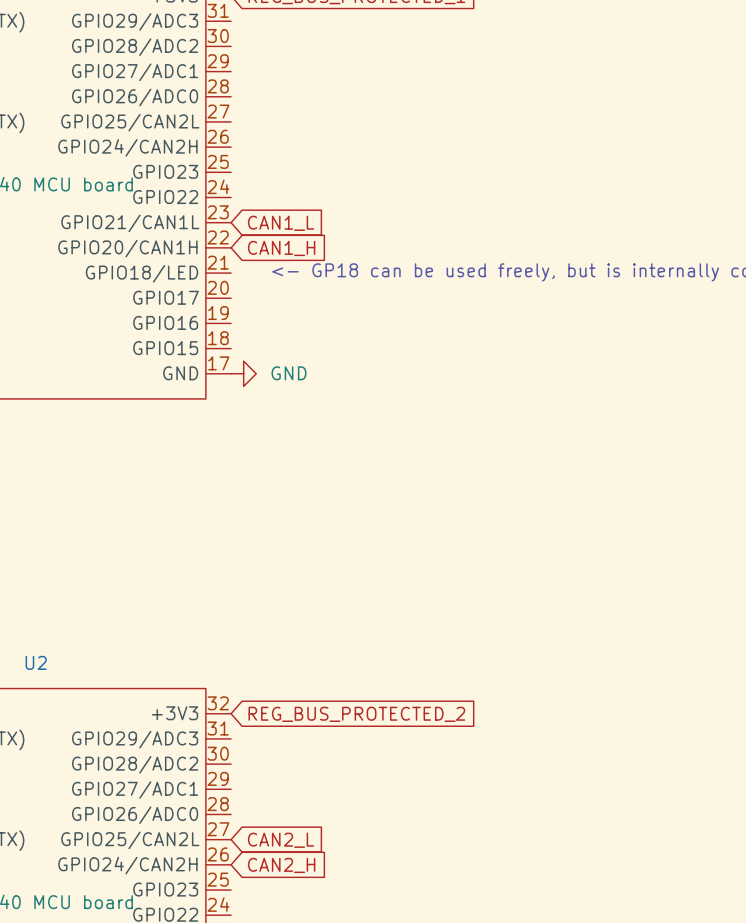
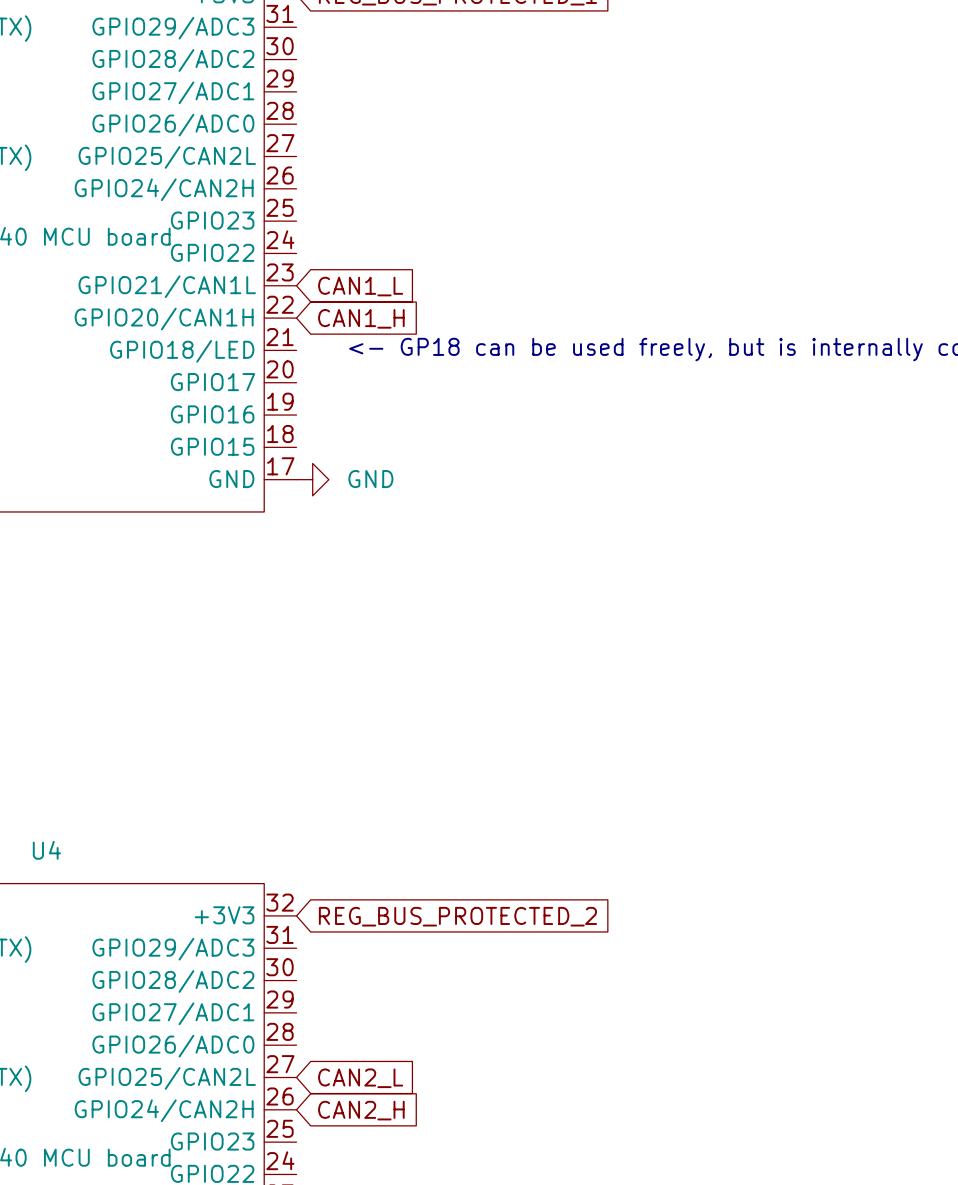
U2 name: U2 (36, 662) -> U4 (46, 850)

